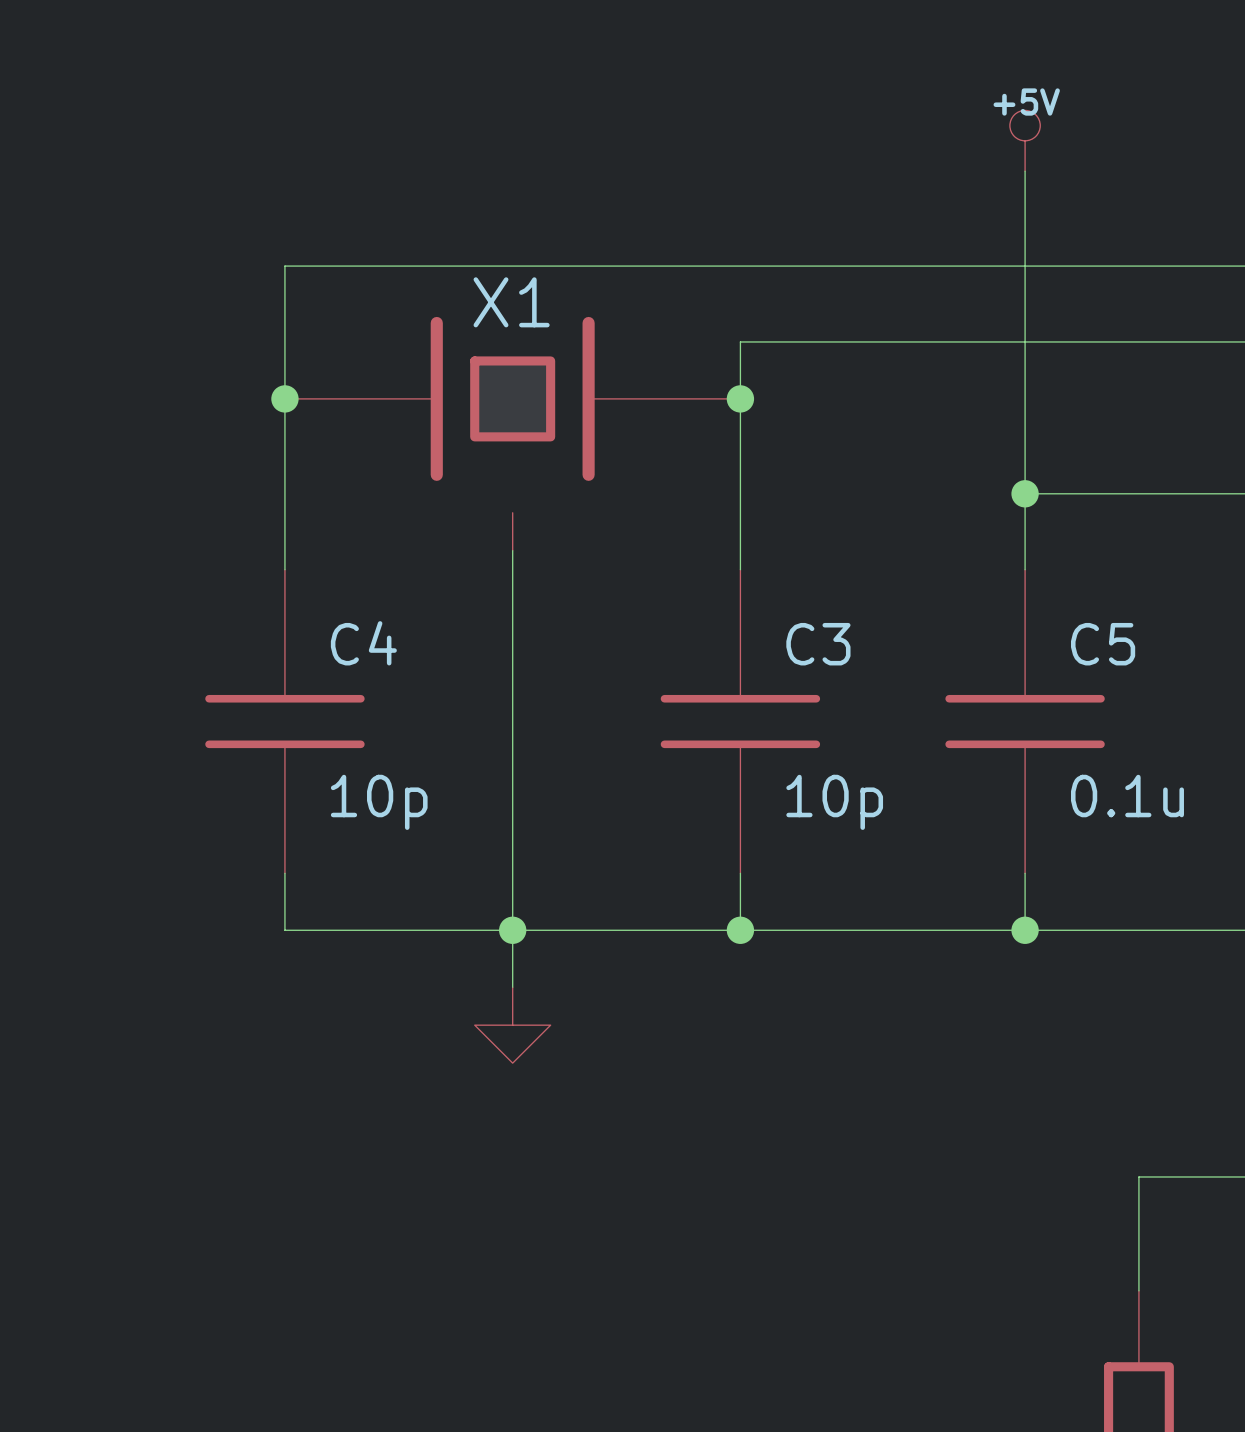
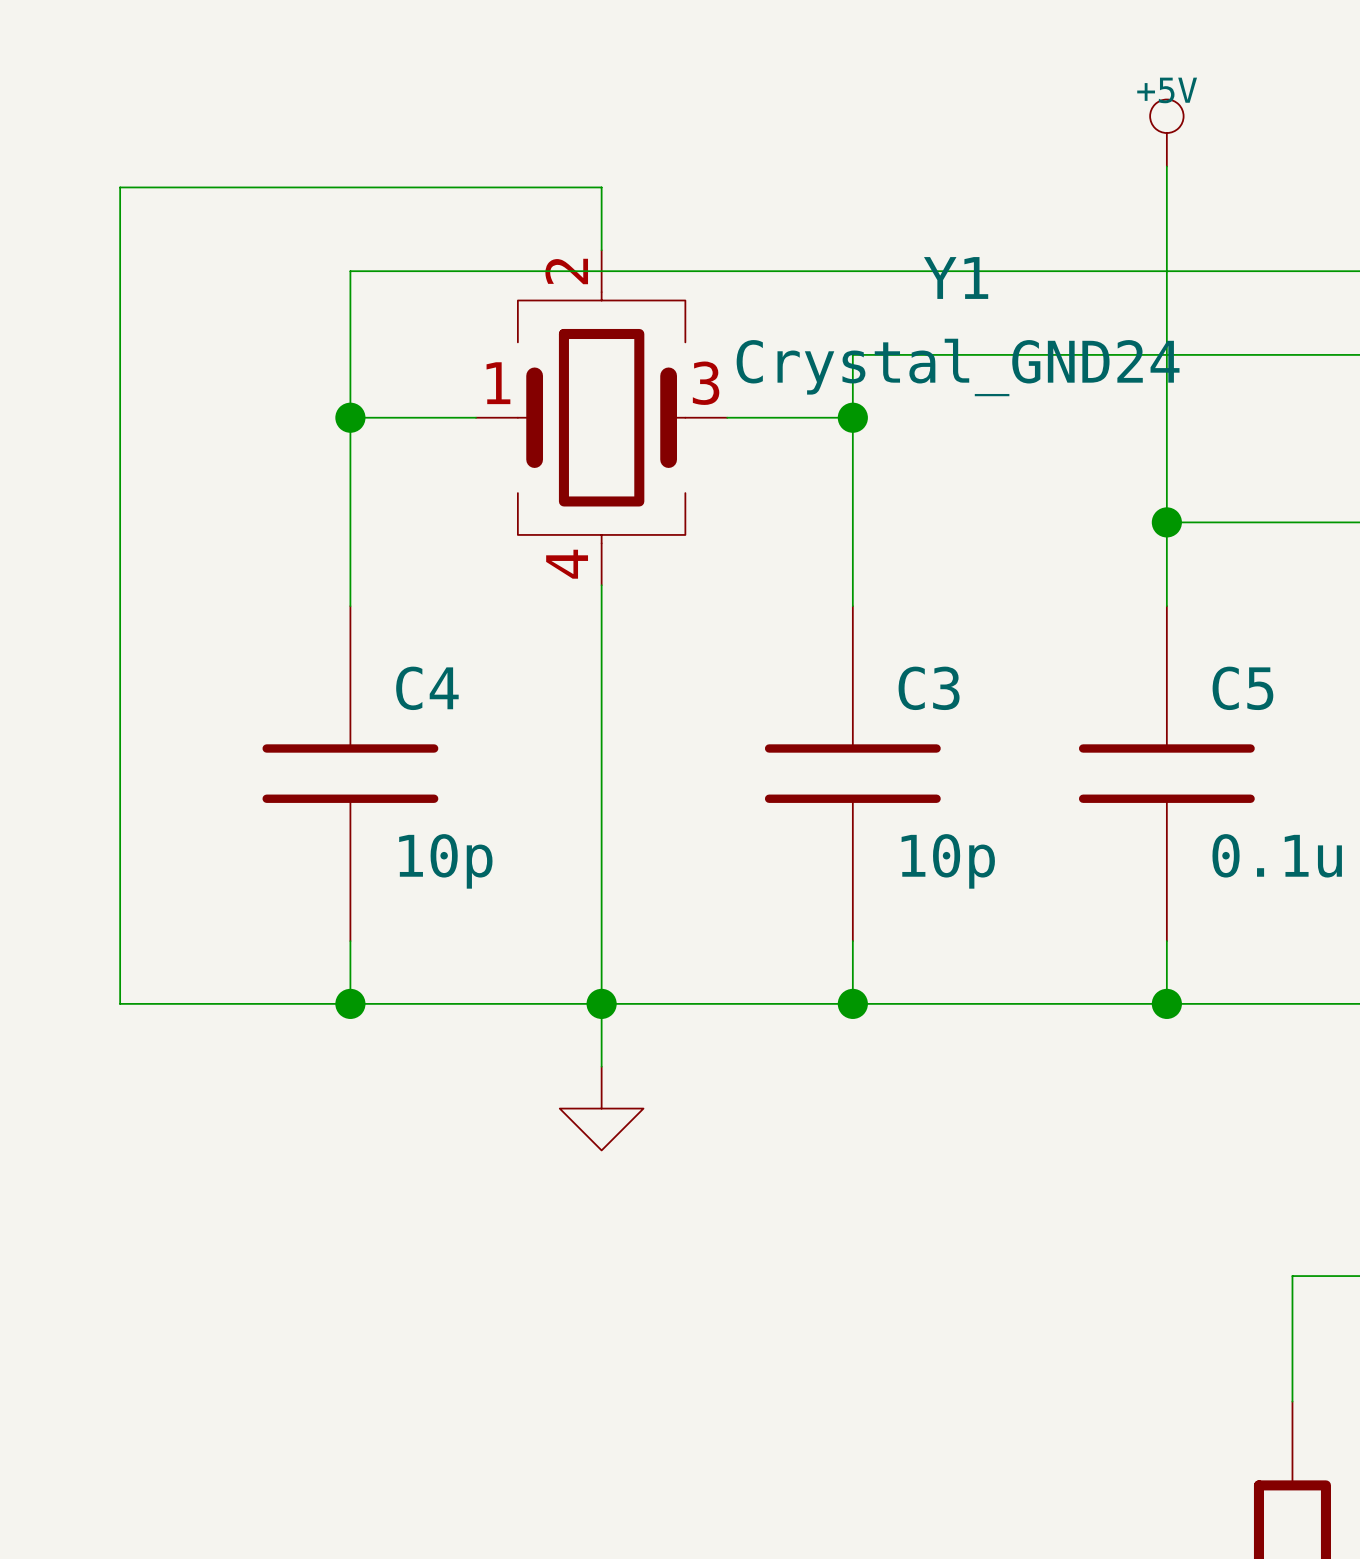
wire: none -> (601, 250) (601, 187) (120, 187) (120, 1003) (350, 1003)
Y1: none -> Crystal_GND24 (601, 417)
X1: (512, 433) -> none
junction: none -> (350, 1003)

